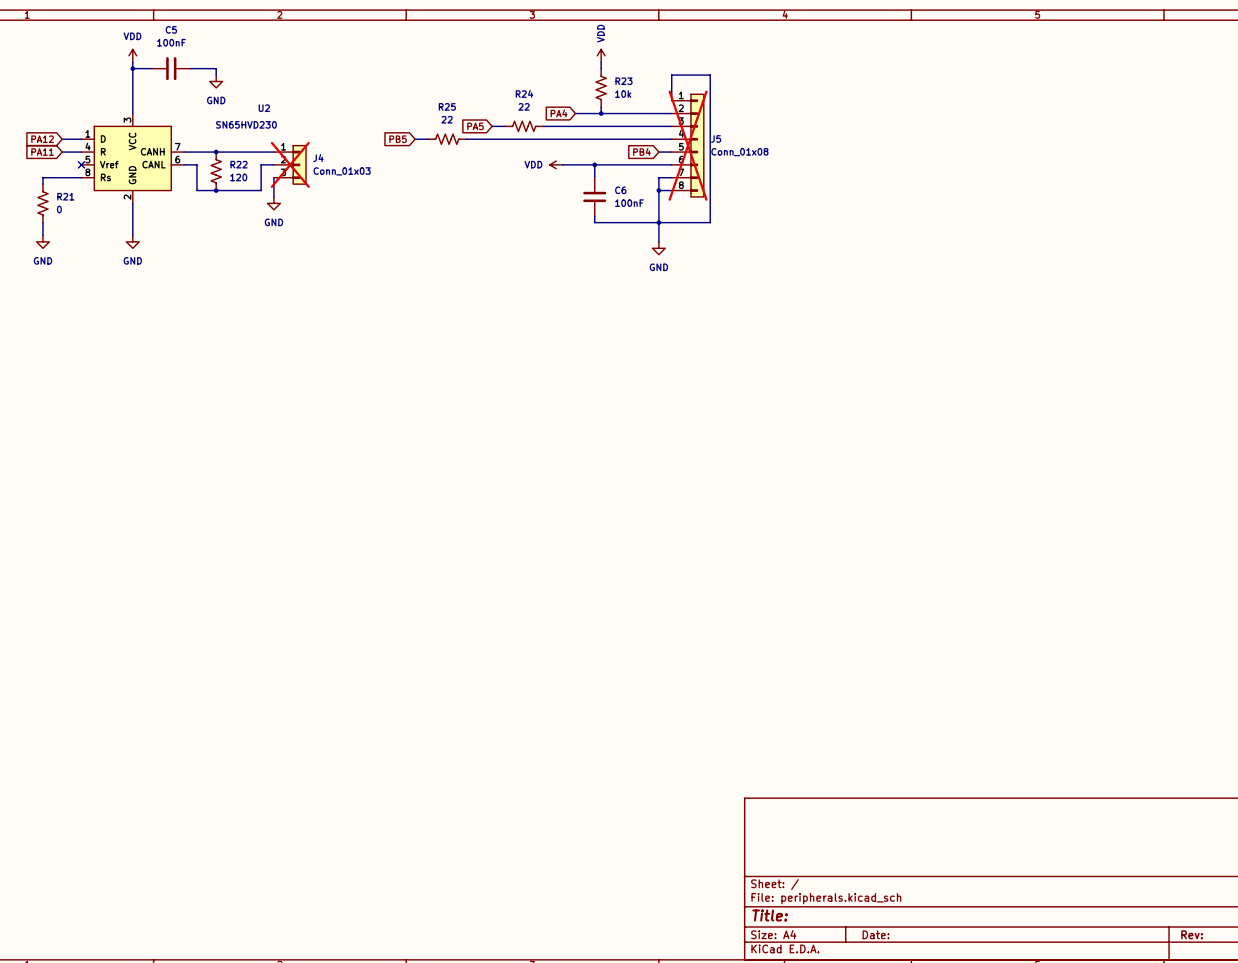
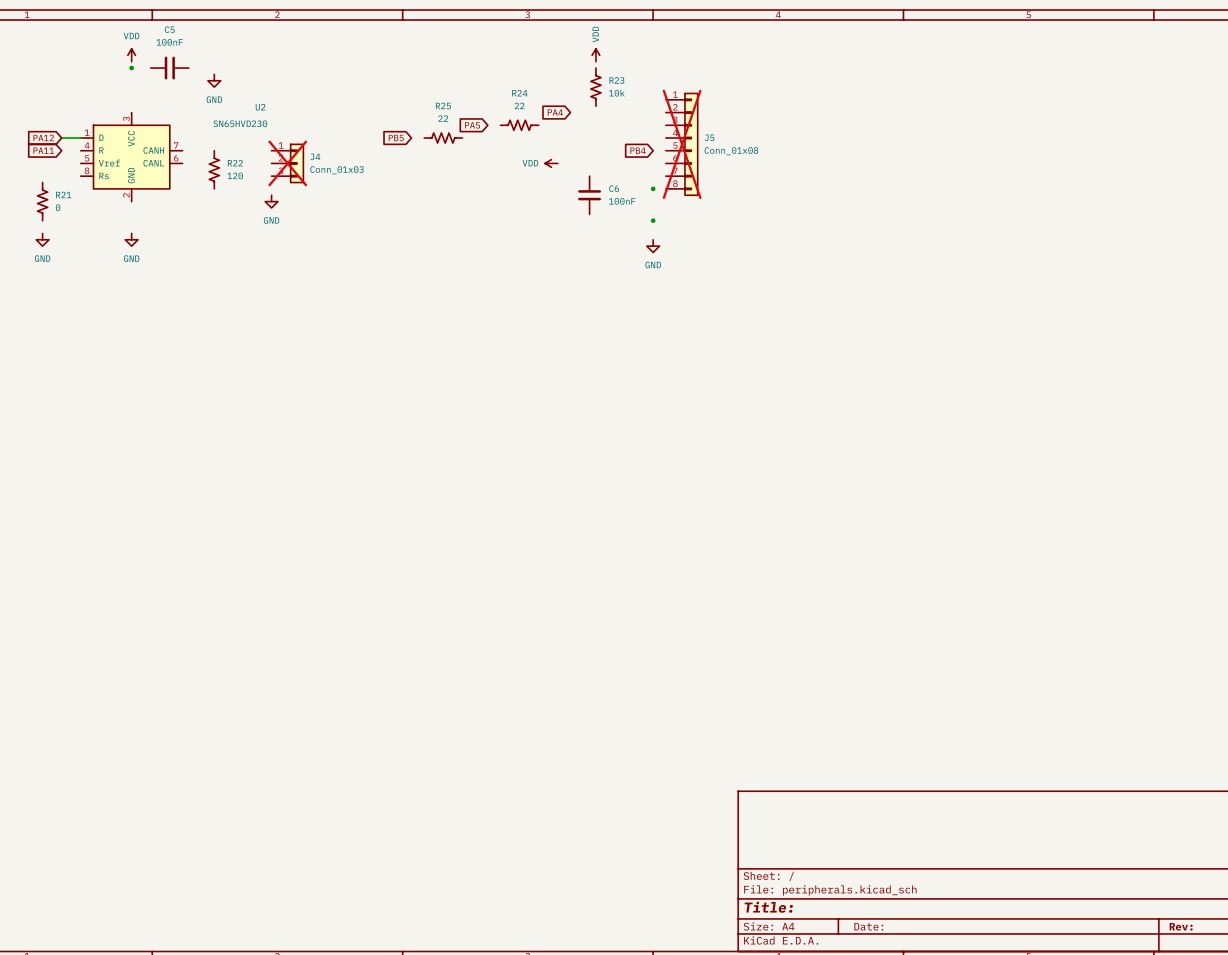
wire: (132, 62) (132, 113) -> none
wire: (601, 62) (601, 68) -> none
wire: (132, 68) (152, 68) -> none
wire: (190, 68) (216, 68) (216, 75) -> none
wire: (671, 100) (671, 75) (710, 75) (710, 222) (594, 222) (594, 216) -> none
wire: (601, 107) (601, 113) -> none
wire: (575, 113) (671, 113) -> none
junction: (601, 113) -> none
wire: (492, 126) (504, 126) -> none
wire: (543, 126) (671, 126) -> none
wire: (415, 139) (427, 139) -> none
wire: (466, 139) (671, 139) -> none
wire: (62, 152) (81, 152) -> none
wire: (184, 152) (273, 152) -> none
junction: (216, 152) -> none
wire: (658, 152) (671, 152) -> none
no-connect mark: (81, 164) -> none
wire: (184, 164) (196, 164) (196, 190) (261, 190) (261, 164) (273, 164) -> none
wire: (562, 164) (671, 164) -> none
wire: (594, 164) (594, 177) -> none
junction: (594, 164) -> none
wire: (81, 177) (42, 177) (42, 184) -> none
wire: (273, 177) (273, 196) -> none
wire: (671, 177) (658, 177) (658, 241) -> none
junction: (216, 190) -> none
wire: (658, 190) (671, 190) -> none
wire: (132, 203) (132, 235) -> none
wire: (42, 222) (42, 235) -> none

